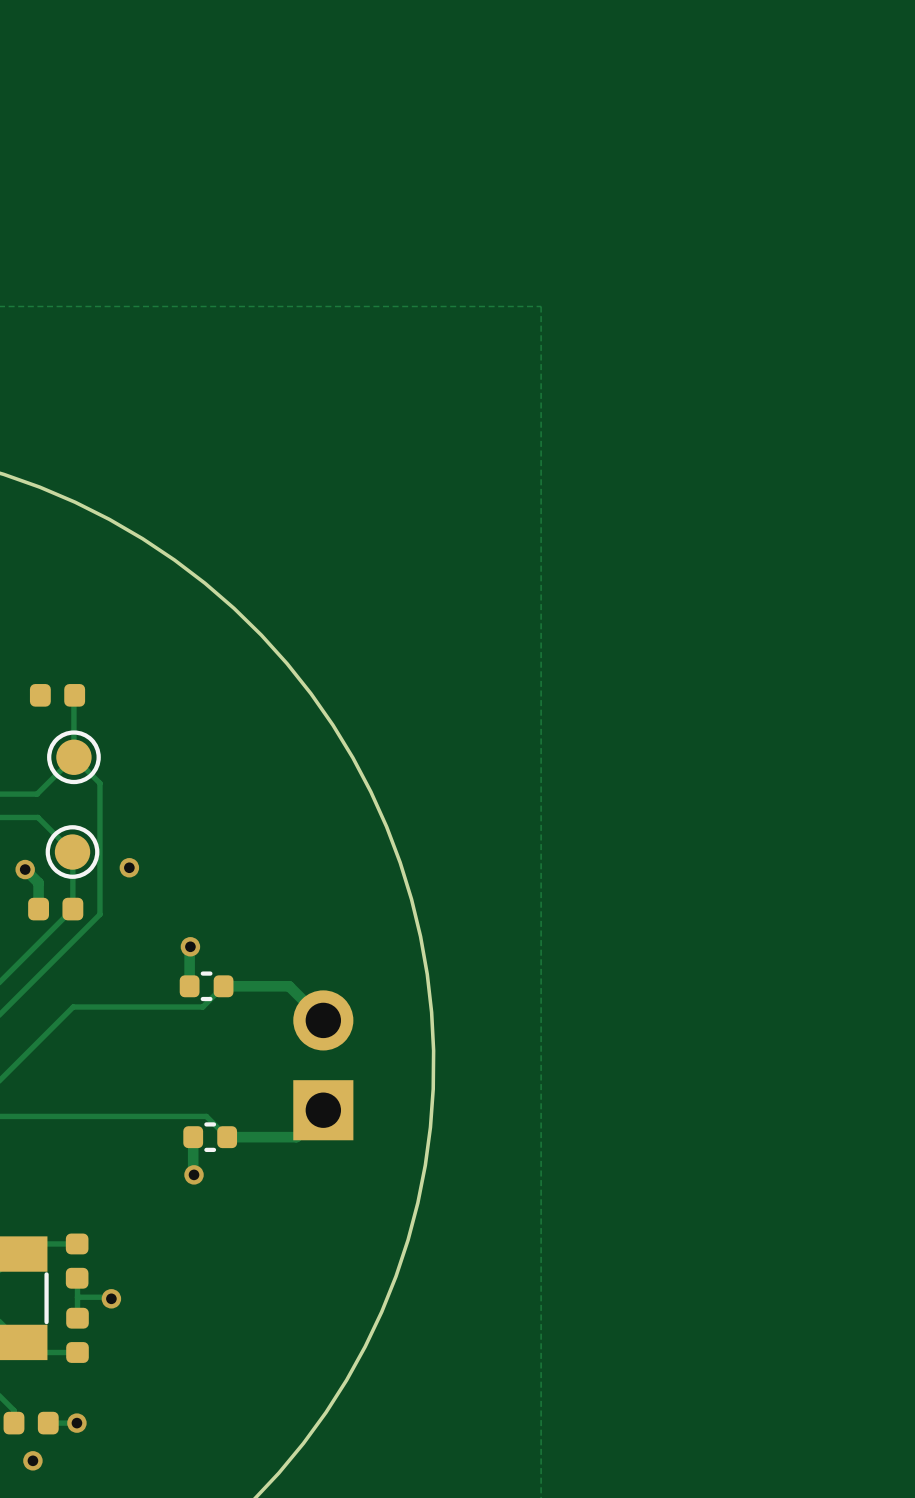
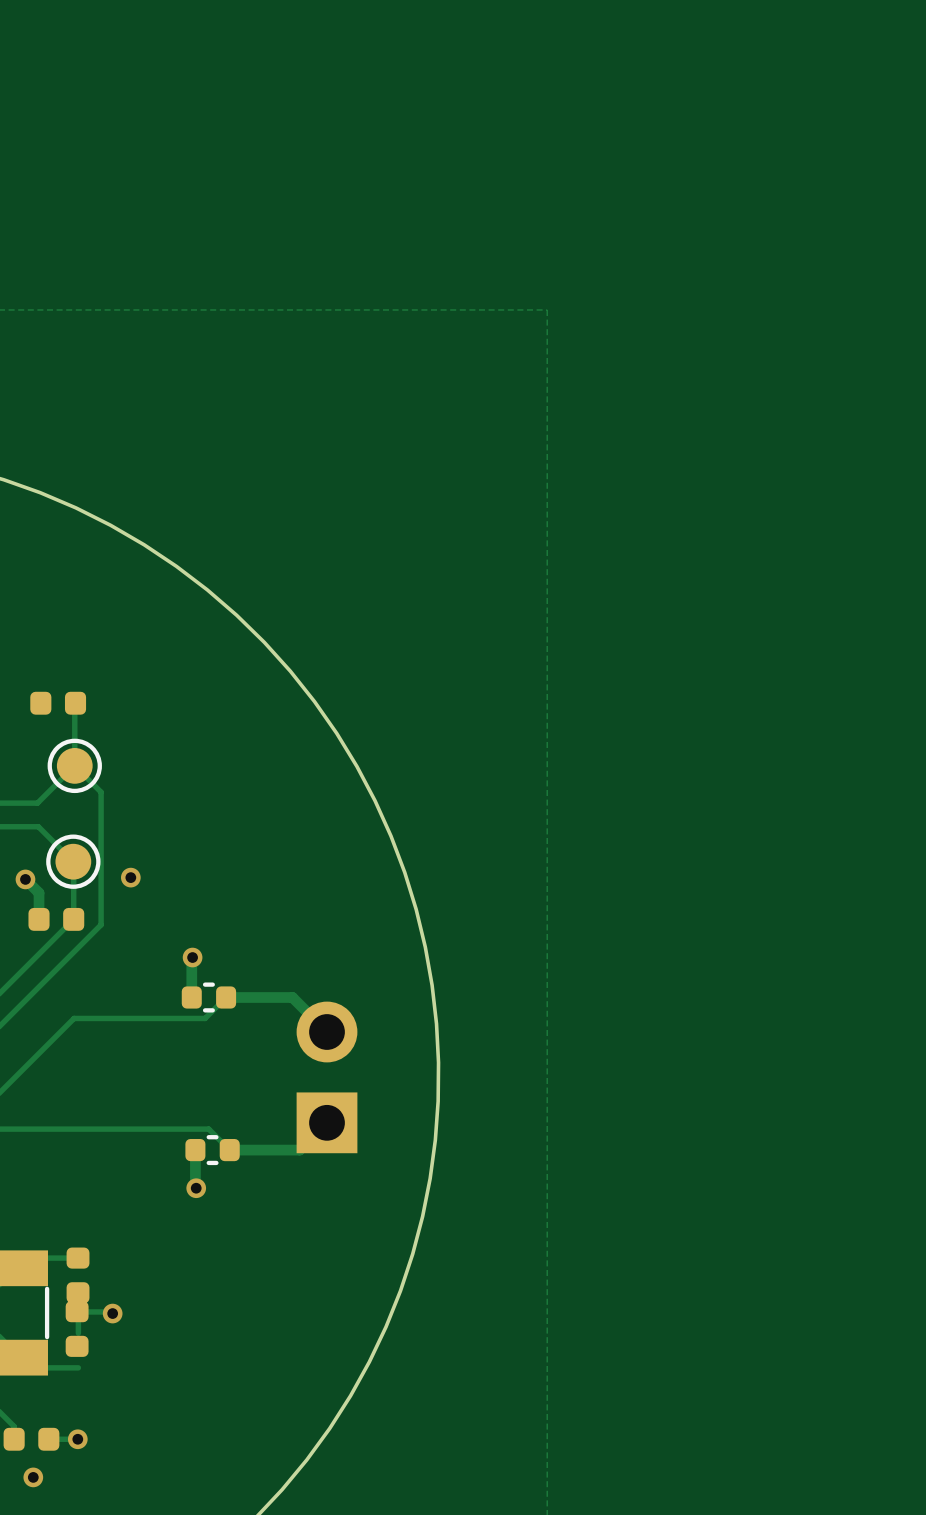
part position: (77, 1335) -> (77, 1329)

